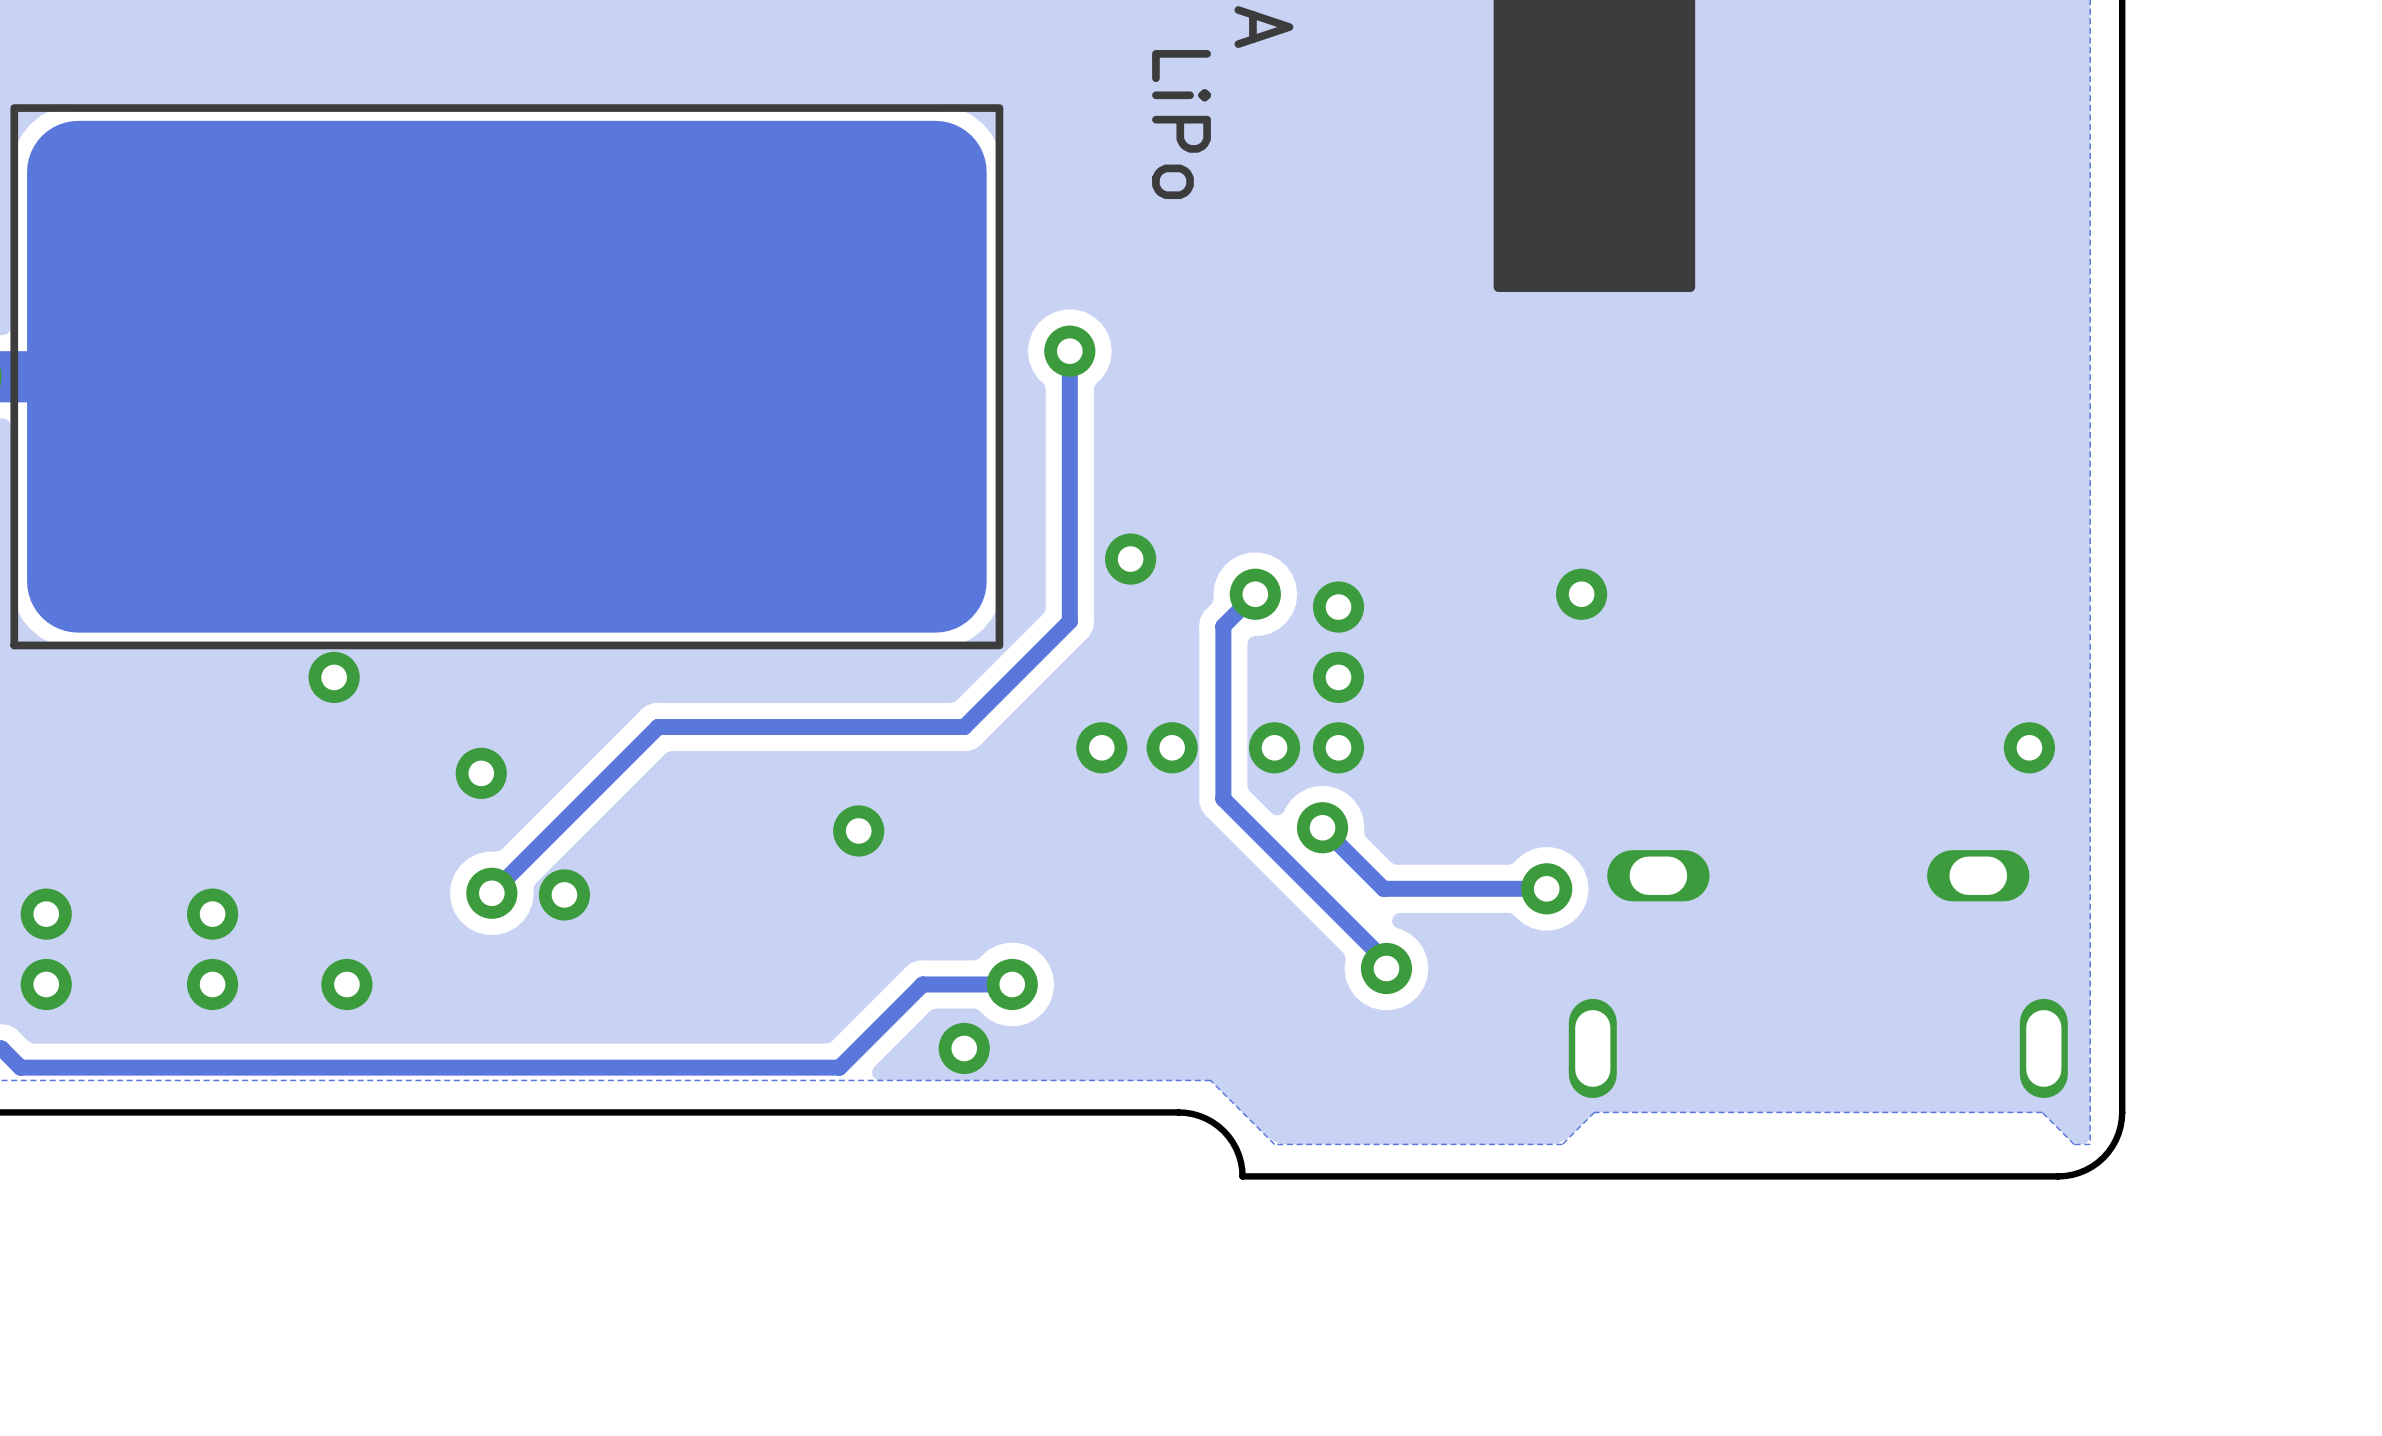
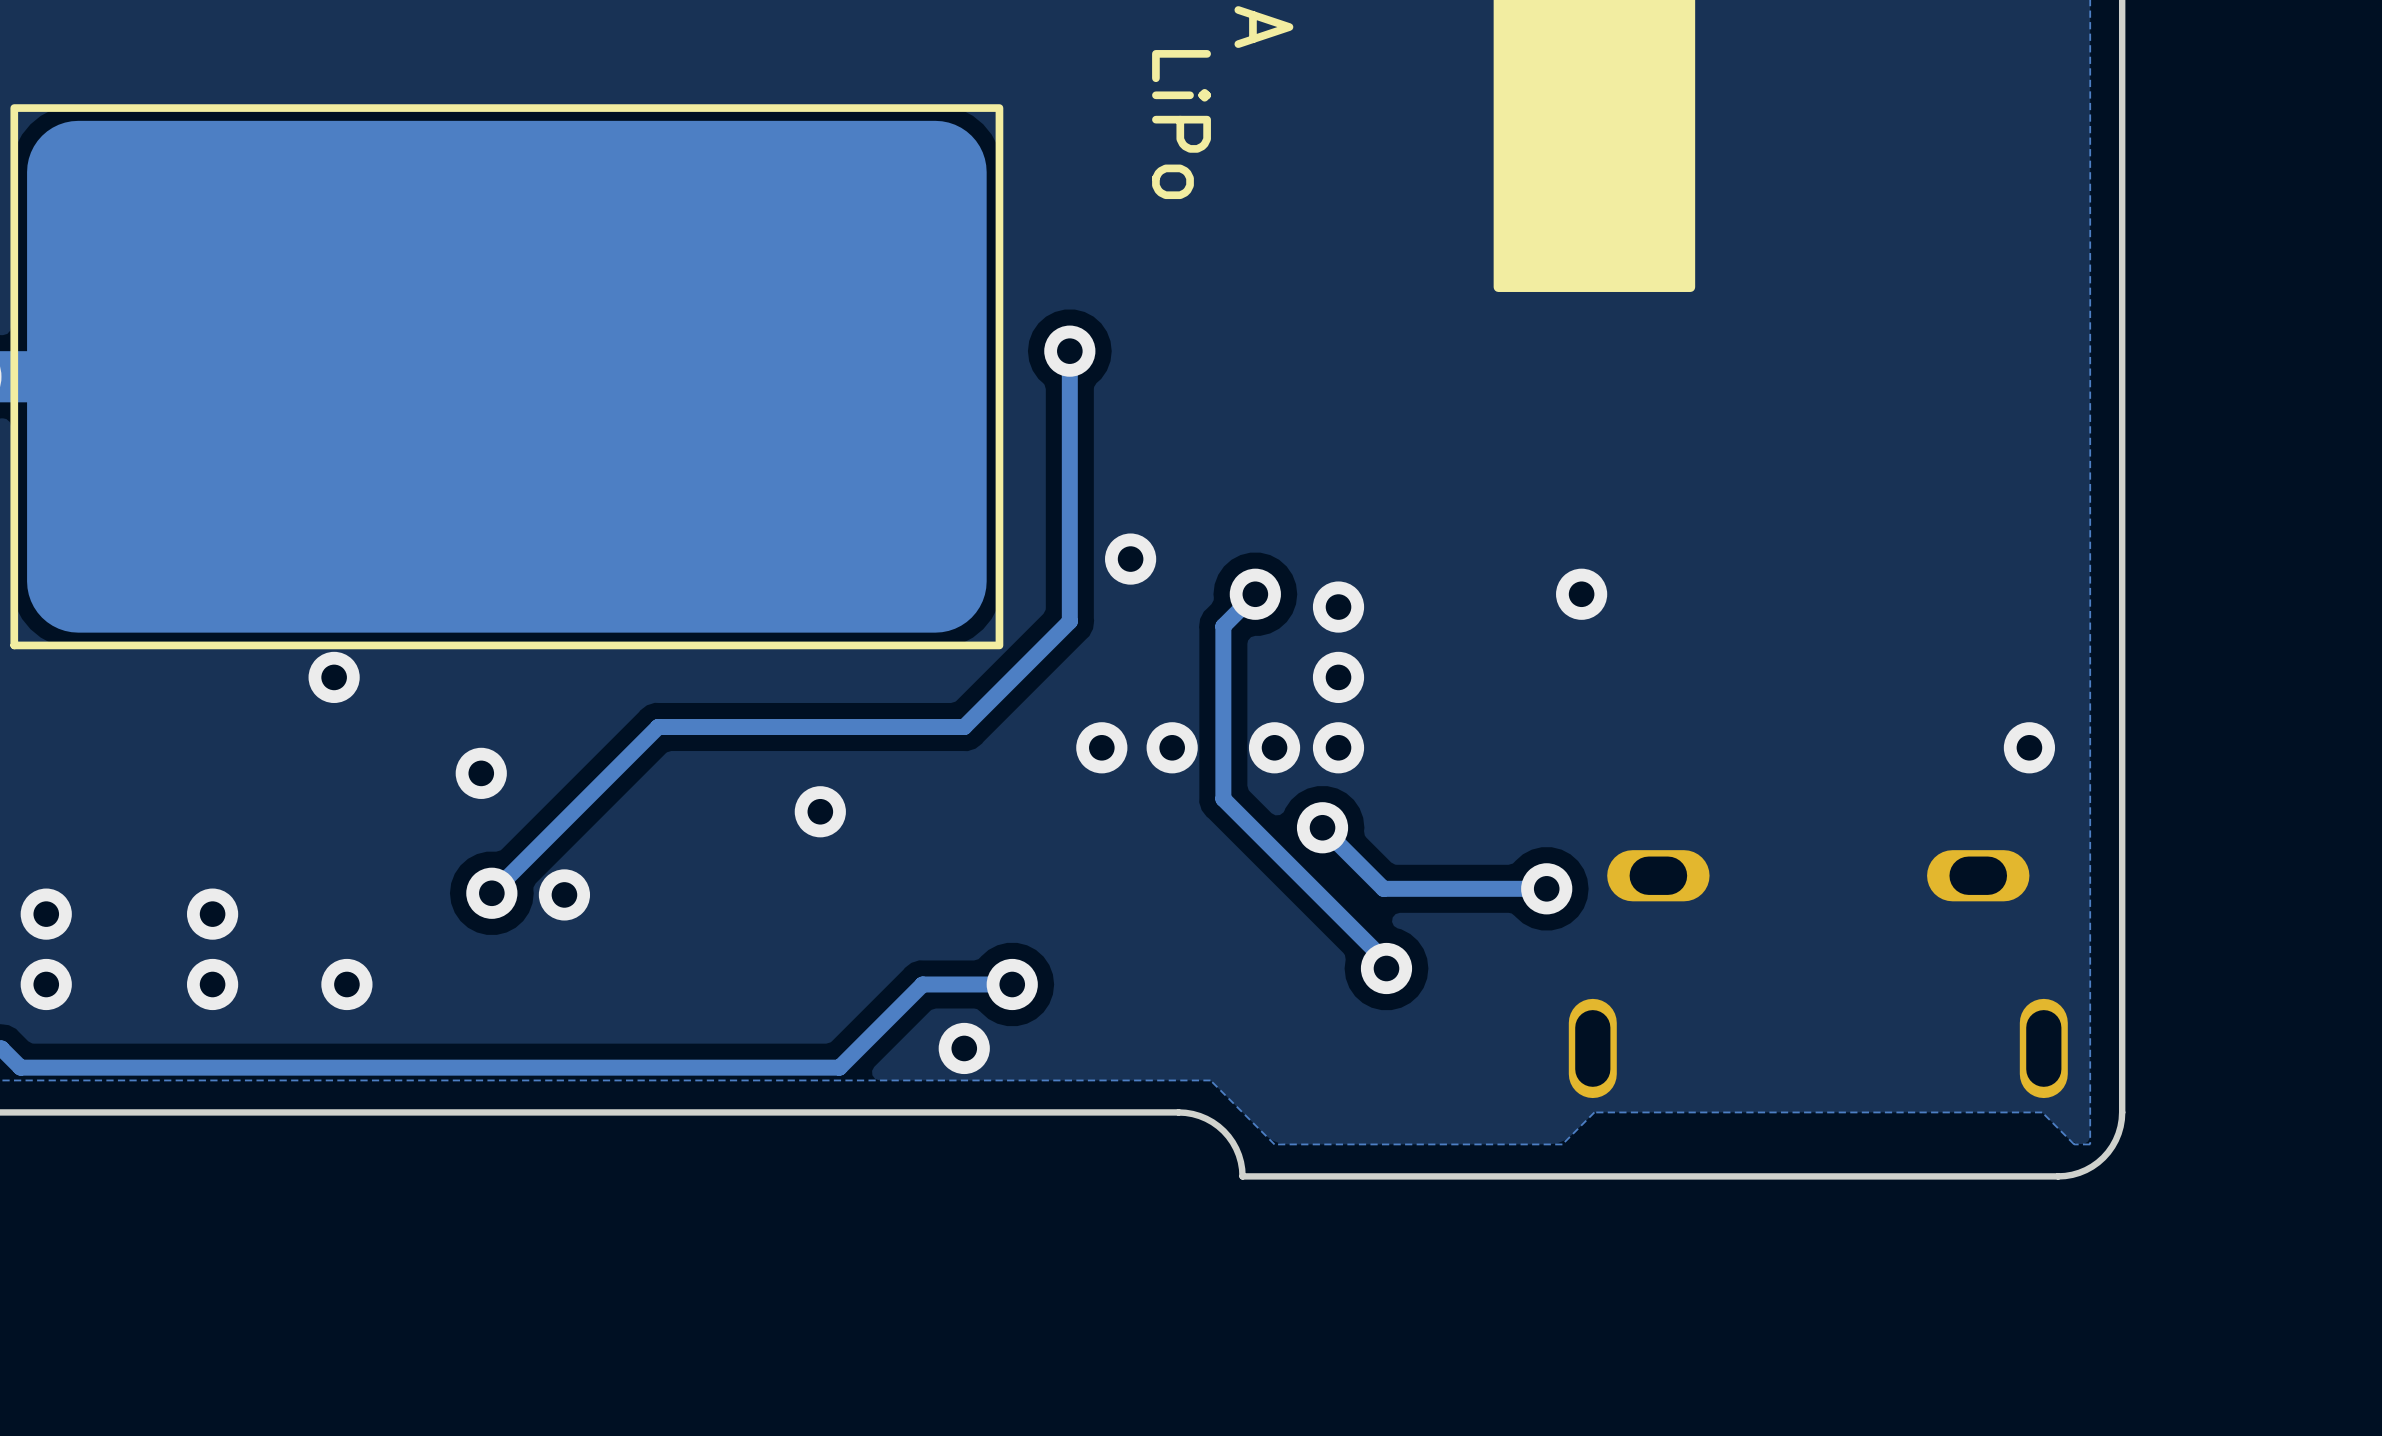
via position: (858, 830) -> (820, 811)

